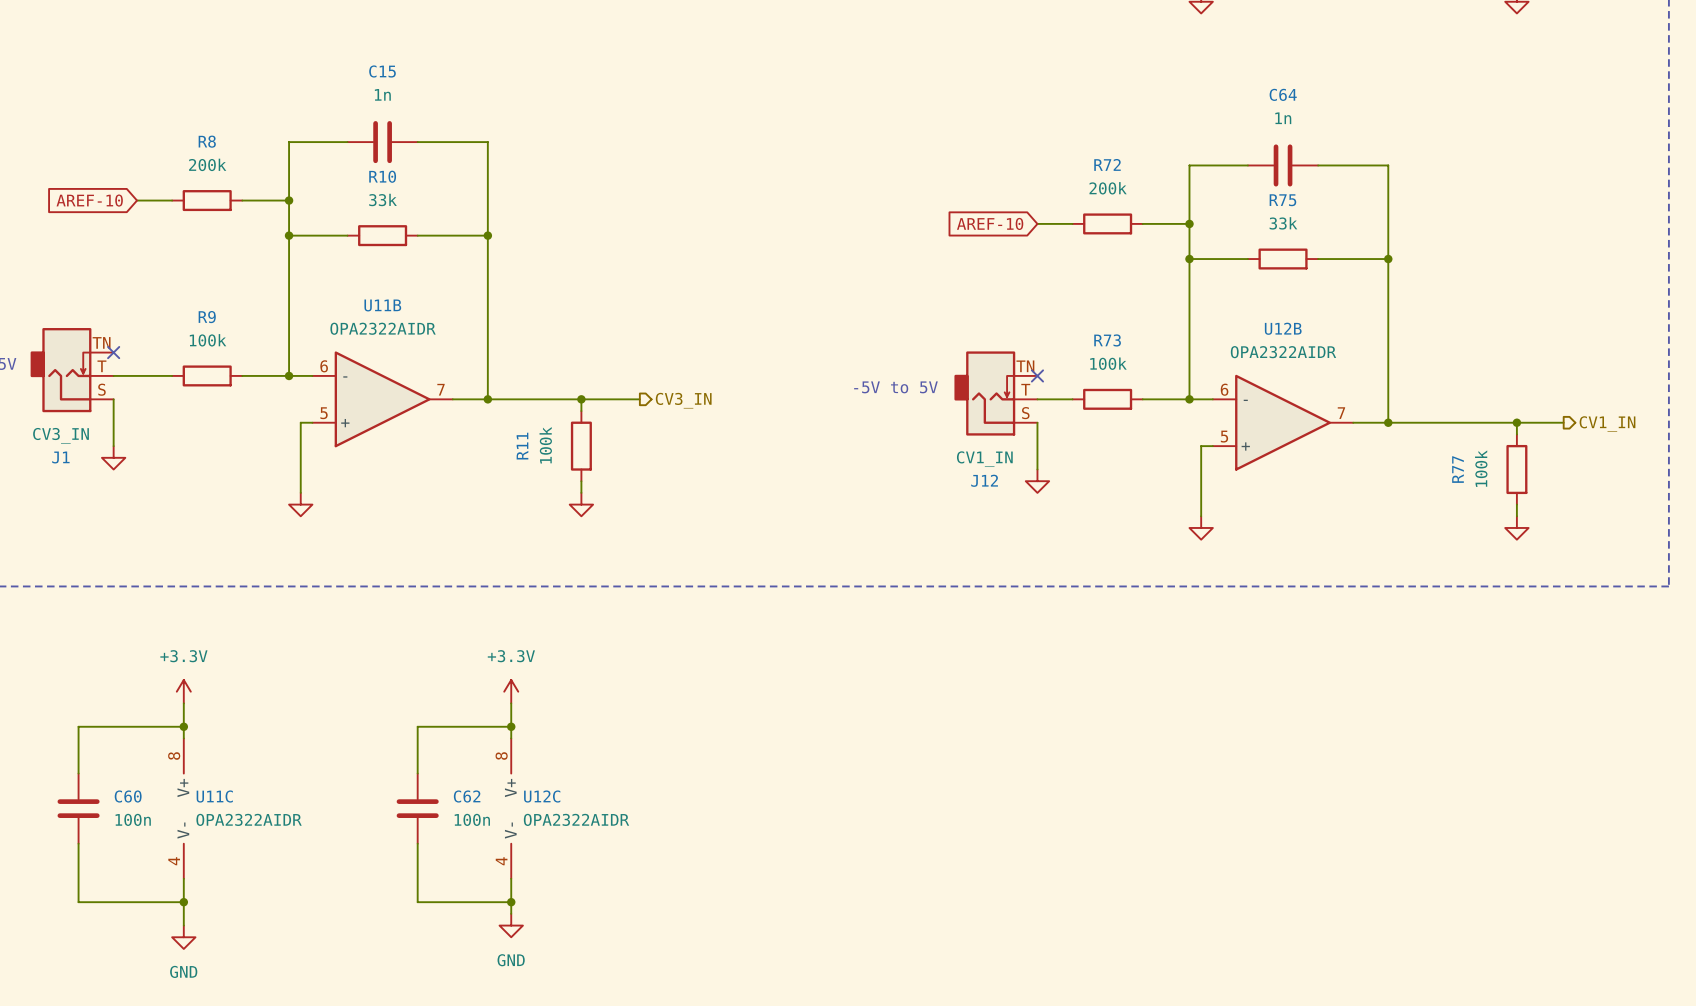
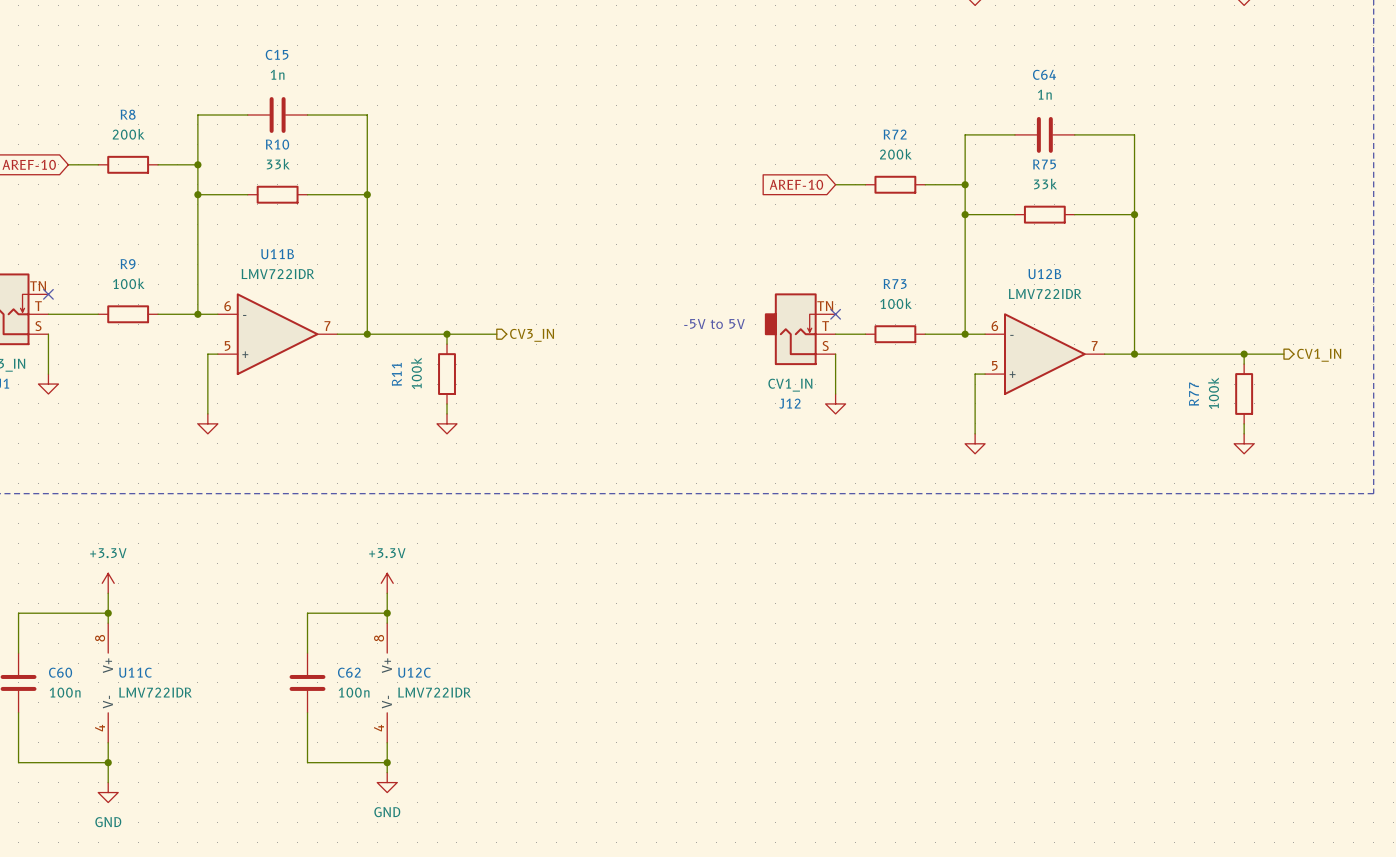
U11B value: OPA2322AIDR (383, 328) -> LMV722IDR (277, 274)
U12B value: OPA2322AIDR (1283, 352) -> LMV722IDR (1045, 294)
U11C value: OPA2322AIDR (249, 819) -> LMV722IDR (155, 692)
U12C value: OPA2322AIDR (576, 819) -> LMV722IDR (434, 692)

